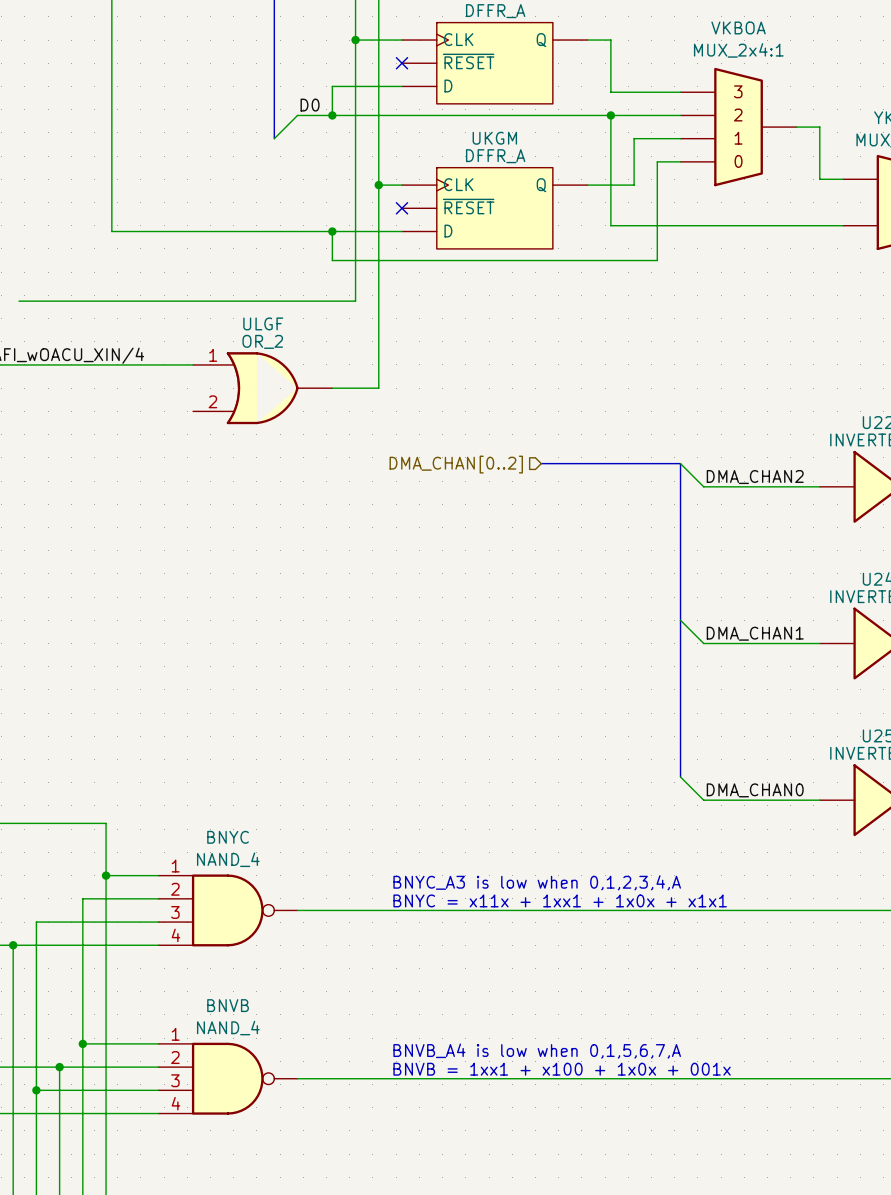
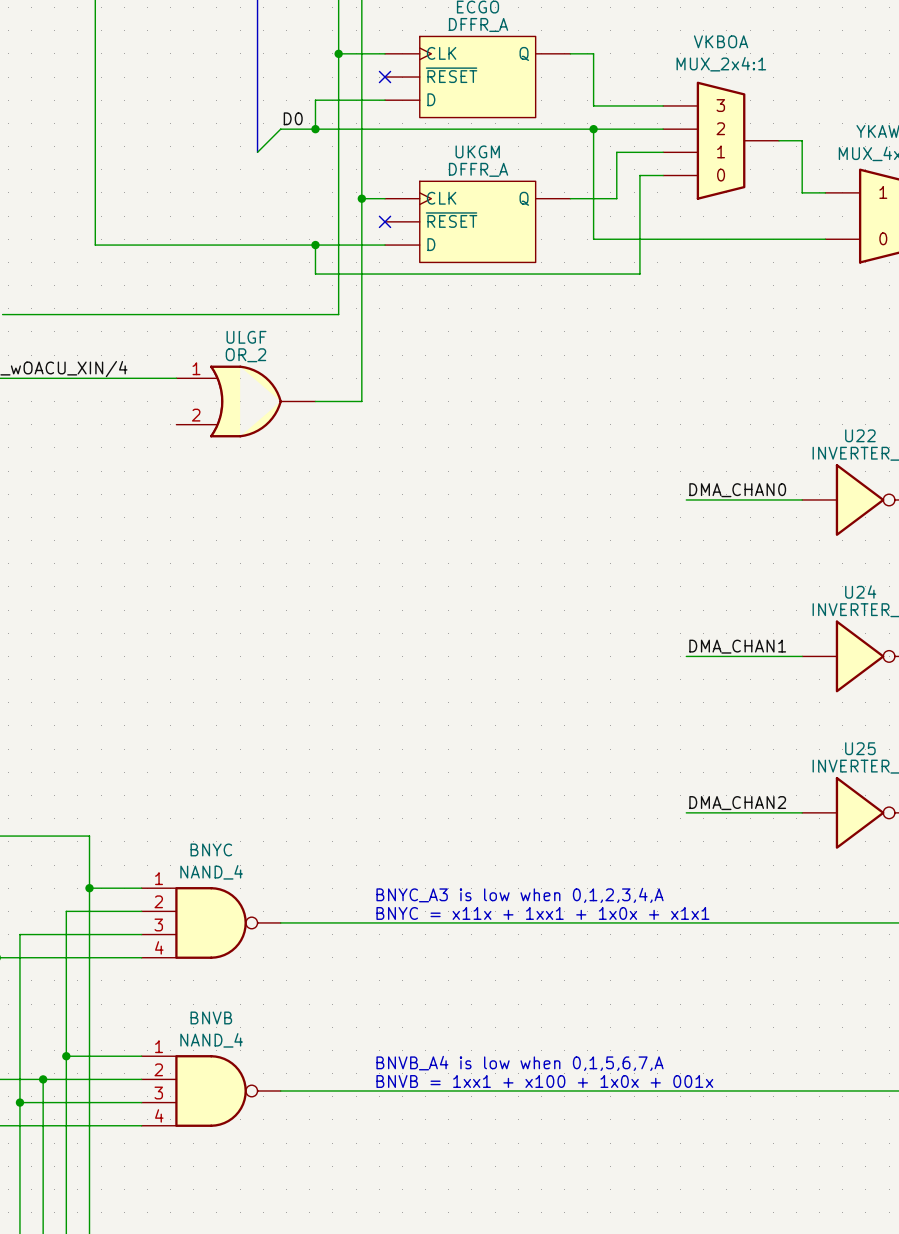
bus: (541, 463) (680, 463) (680, 776) -> none
wire: (680, 463) (703, 486) -> none
hierarchical label: DMA_CHAN[0..2] (456, 464) -> none
label: DMA_CHAN2 (755, 477) -> DMA_CHAN0 (737, 490)
wire: (680, 620) (703, 643) -> none
wire: (680, 776) (703, 800) -> none
label: DMA_CHAN0 (755, 790) -> DMA_CHAN2 (737, 803)

